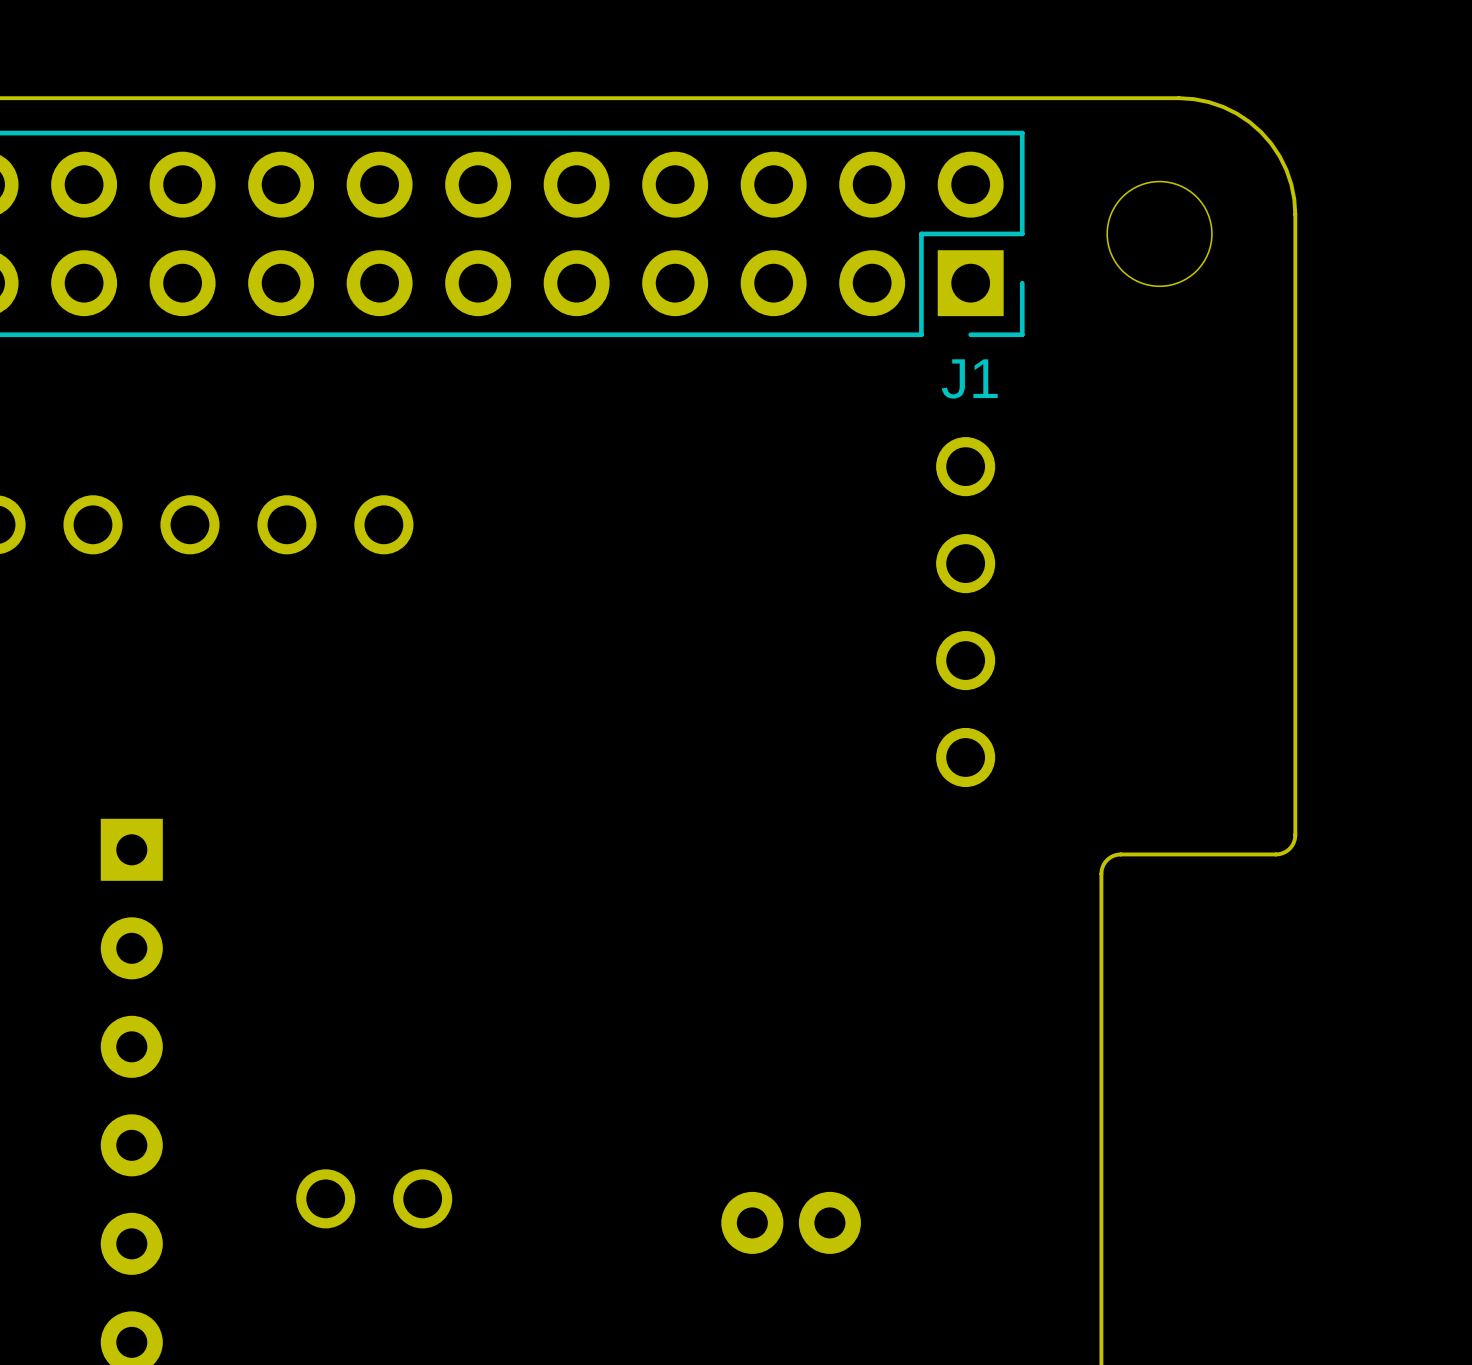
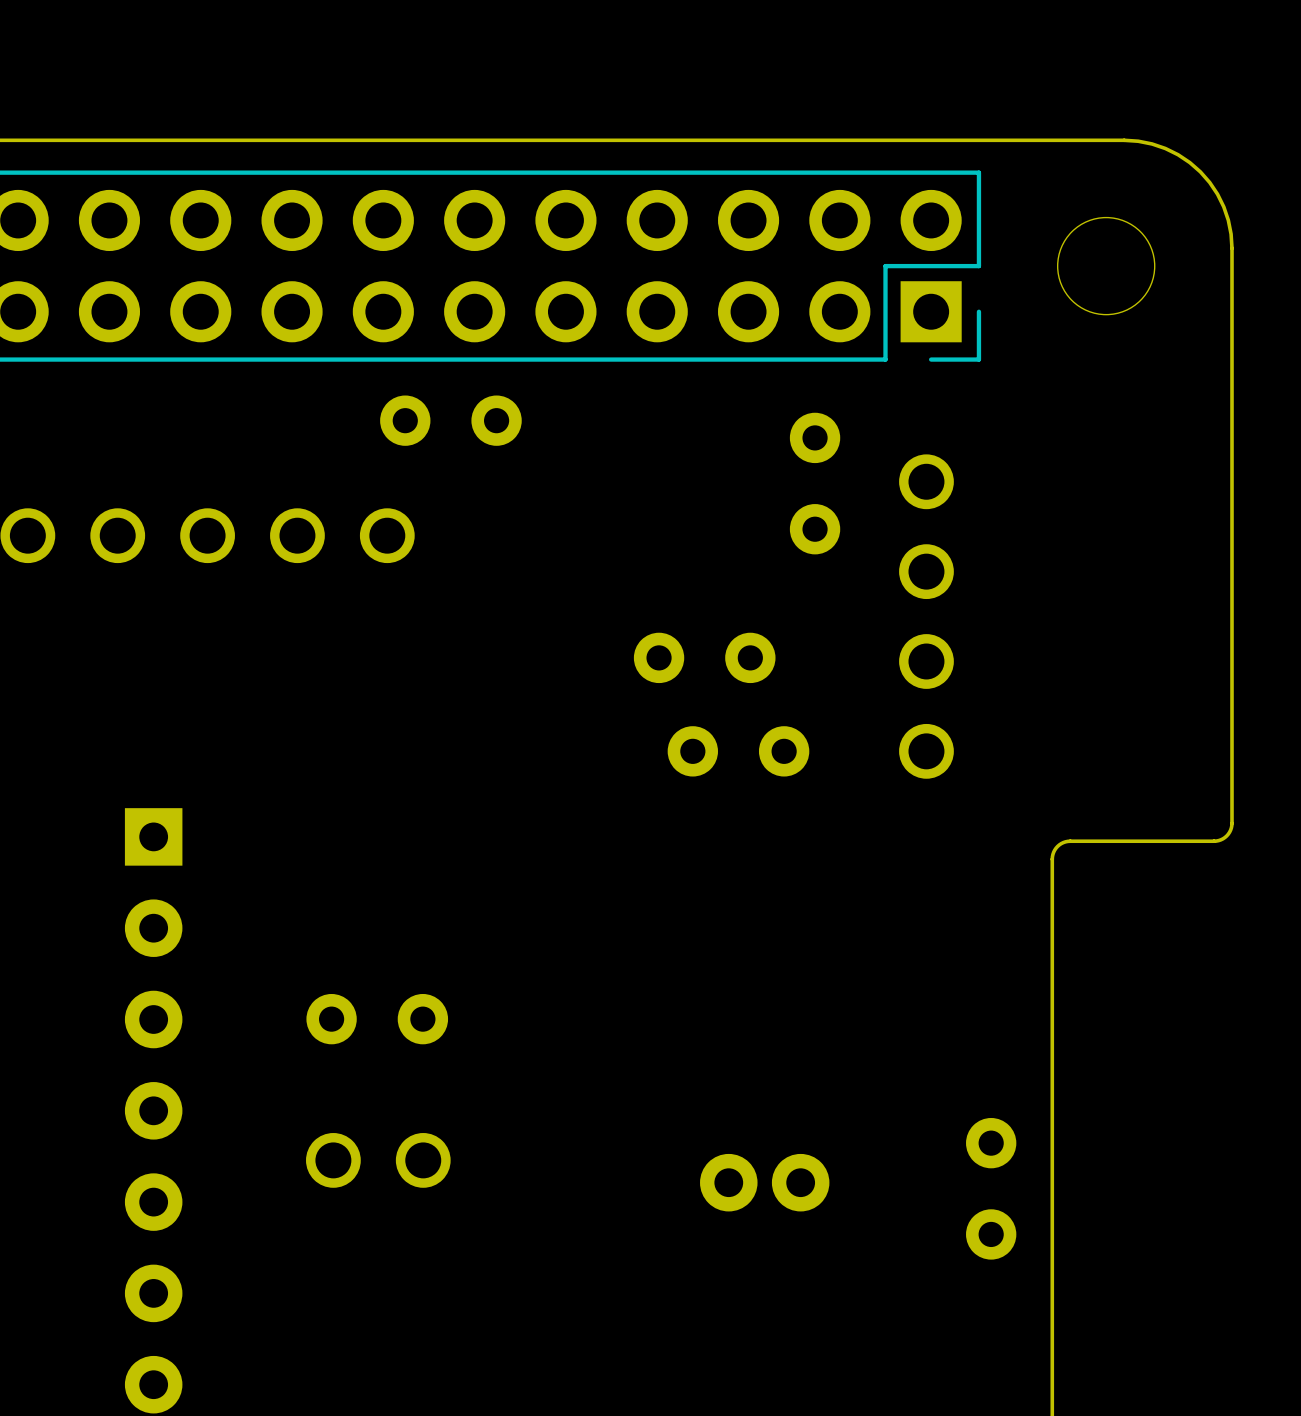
J1 name: J1 (969, 378) -> none
part: none -> (450, 420)
part: none -> (815, 483)
part: none -> (704, 657)
part: none -> (738, 751)
part: none -> (377, 1019)
part: none -> (991, 1188)

